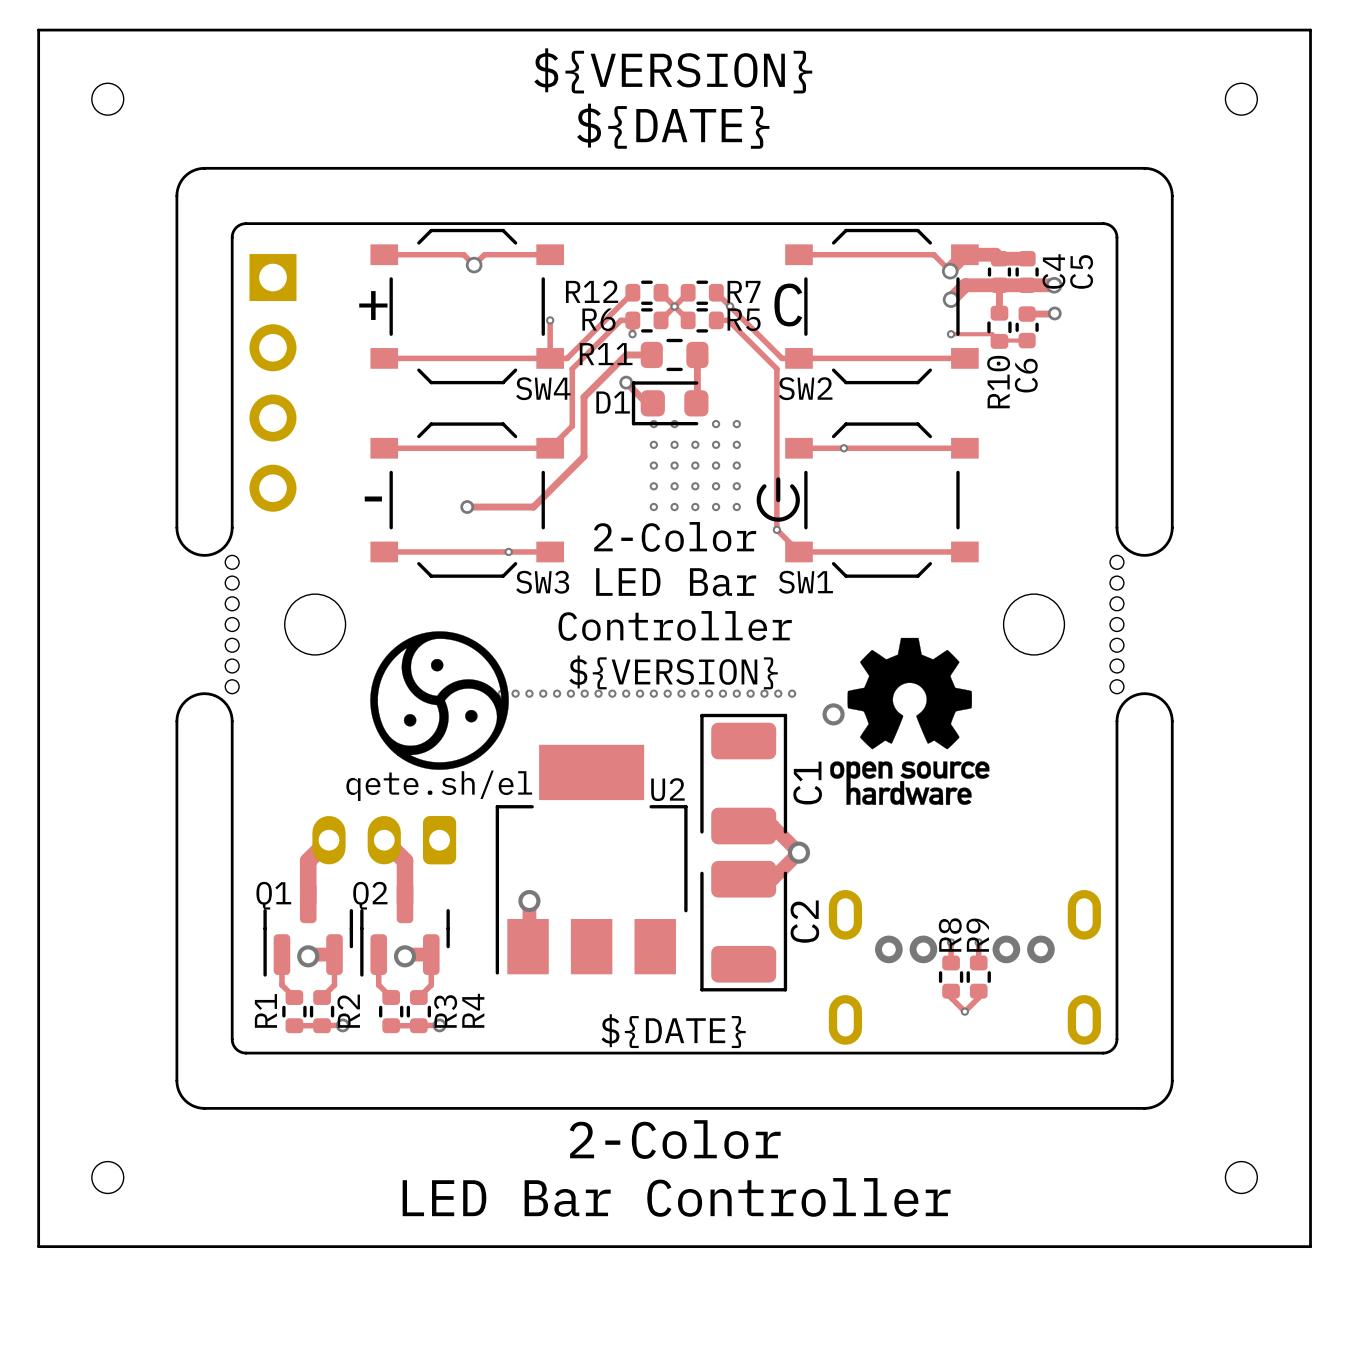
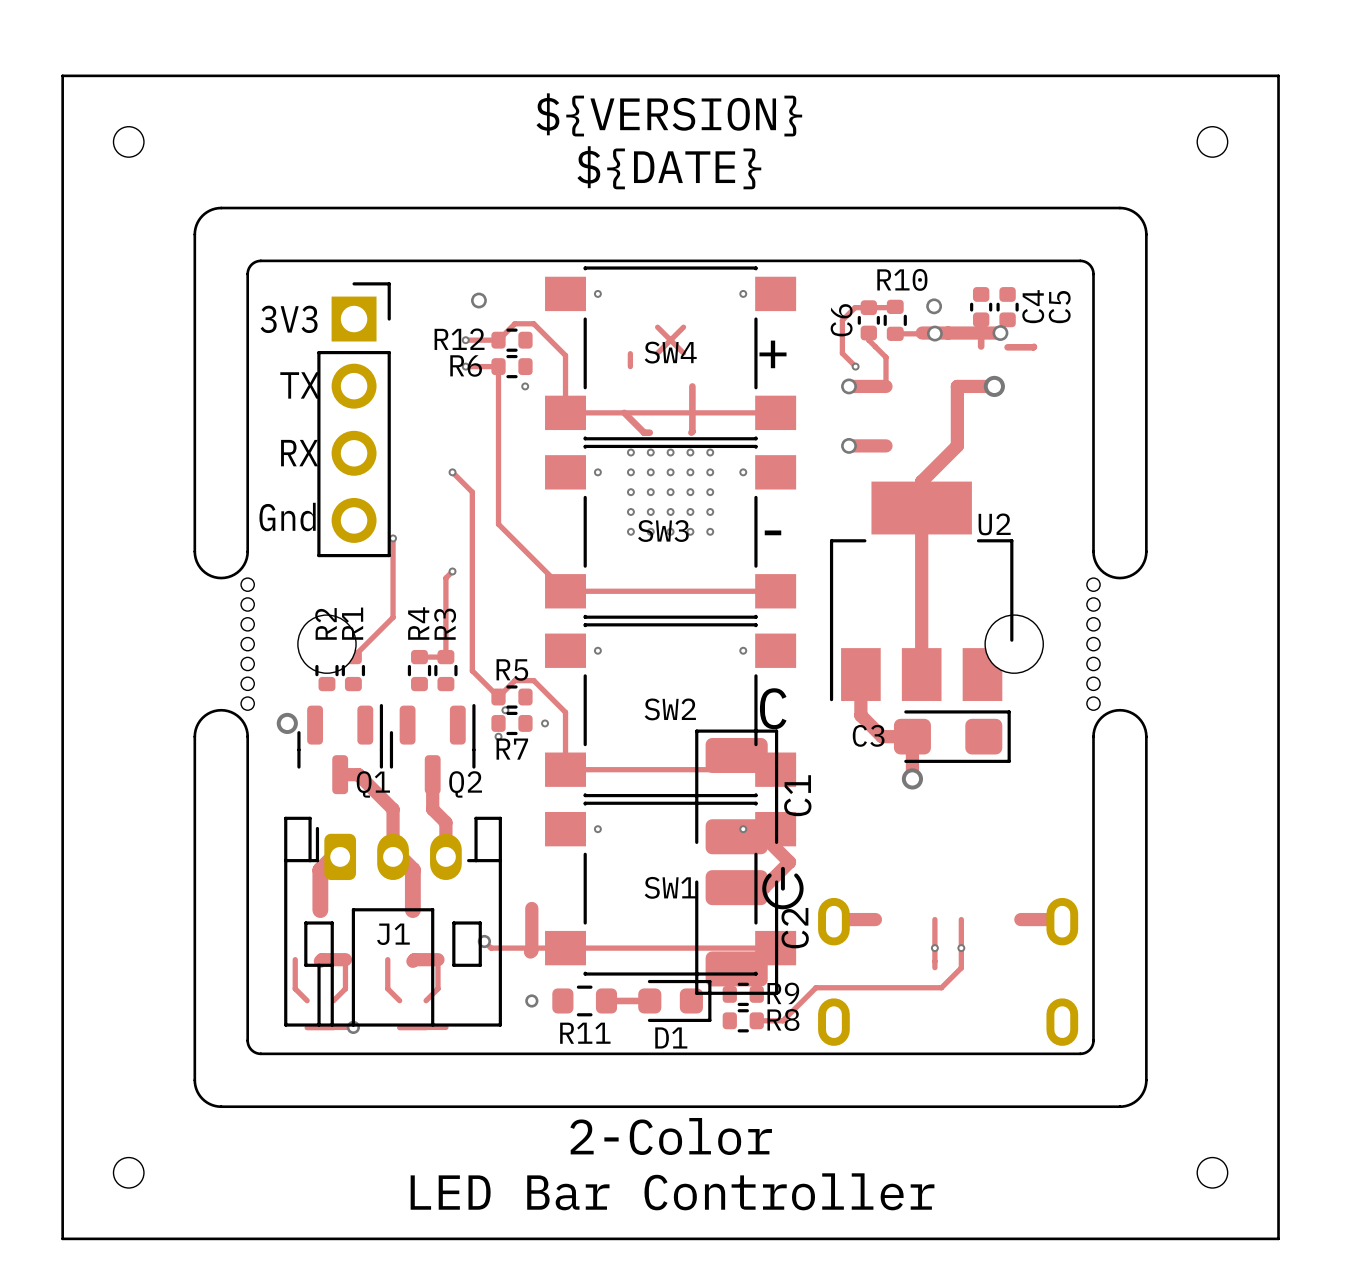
SW4 footprint: [370, 228, 564, 385] -> [545, 266, 797, 441]
SW2 footprint: [785, 228, 979, 385] -> [545, 623, 797, 798]
track: (384, 254) (463, 254) (474, 265) (484, 254) (550, 254) -> none
track: (799, 254) (933, 254) (950, 271) (964, 254) (995, 254) (999, 258) (1027, 258) -> none
via: none -> (597, 293)
via: none -> (743, 293)
track: none -> (895, 306) (855, 307) (842, 320) (842, 353) (855, 366)
text: none -> 3V3 (289, 319)
track: (1054, 285) (965, 285) (951, 299) -> none
via position: (1054, 285) -> (1000, 333)
R7 name position: R7 (744, 291) -> R7 (512, 749)
track: (632, 292) (567, 358) (384, 358) -> none
R12 position: (646, 292) -> (511, 340)
R5 position: (702, 292) -> (511, 697)
track: (716, 292) (782, 358) (964, 358) -> none
track: none -> (868, 333) (868, 340) (886, 357) (886, 386) (849, 386)
track: none -> (1000, 333) (901, 333)
text rotation: 0° (373, 305) -> 180° (773, 354)
text position: + (373, 305) -> + (773, 354)
text position: C (788, 305) -> C (773, 708)
track: none -> (465, 340) (498, 340) (514, 323) (533, 323) (565, 355) (565, 412) (775, 412)
via: none -> (465, 340)
via: (674, 306) -> none
via: (730, 306) -> none
via: (1054, 313) -> none
R5 name position: R5 (744, 319) -> R5 (512, 669)
track: (550, 320) (550, 358) -> none
via: (550, 320) -> none
track: (632, 320) (620, 320) (572, 368) (572, 426) (550, 448) (384, 448) -> none
R6 position: (646, 320) -> (511, 366)
R7 position: (702, 320) -> (511, 723)
track: (716, 320) (728, 320) (776, 368) (776, 529) (799, 551) (964, 551) -> none
R10 position: (999, 327) -> (895, 320)
C6 position: (1027, 327) -> (868, 320)
track: none -> (465, 366) (498, 366) (498, 524) (565, 591) (775, 591)
via: none -> (465, 366)
via: (632, 334) -> none
via: none -> (855, 366)
track: (951, 334) (992, 334) (999, 341) (1027, 340) -> none
via: (951, 334) -> none
text: none -> TX (299, 385)
via: none -> (525, 386)
R11 name position: R11 (606, 354) -> R11 (585, 1033)
track: (651, 354) (626, 354) (584, 397) (584, 456) (533, 507) (467, 507) -> none
R11 position: (674, 354) -> (584, 1000)
via: none -> (849, 386)
track: none -> (994, 386) (957, 386) (957, 445) (921, 481) (921, 674)
via: none -> (994, 386)
C6 name position: C6 (1026, 375) -> C6 (841, 320)
part side: bottom (272, 382) -> top (354, 419)
via: (626, 382) -> none
R10 name rotation: 0° (998, 382) -> 90° clockwise (902, 279)
R10 name position: R10 (998, 382) -> R10 (902, 279)
SW4 name position: SW4 (543, 388) -> SW4 (670, 352)
SW2 name position: SW2 (805, 388) -> SW2 (670, 709)
D1 name position: D1 (613, 402) -> D1 (671, 1037)
D1 rotation: 0° (670, 403) -> 180° (674, 1000)
D1 position: (670, 403) -> (674, 1000)
track: none -> (849, 445) (886, 445)
via: none -> (849, 445)
SW3 footprint: [370, 422, 564, 578] -> [545, 444, 797, 619]
SW1 footprint: [785, 422, 979, 578] -> [545, 801, 797, 976]
text: none -> RX (299, 453)
via: none -> (630, 452)
via: none -> (690, 452)
via: (736, 424) -> none
track: none -> (452, 472) (472, 492) (472, 670) (498, 697) (514, 680) (533, 680) (565, 712) (565, 769) (775, 769)
via: none -> (452, 472)
via: none -> (597, 472)
via: none -> (630, 472)
via: (736, 444) -> none
via: none -> (743, 472)
track: (799, 448) (964, 448) -> none
via: (843, 448) -> none
via: none -> (630, 492)
via: (736, 465) -> none
line: (778, 479) (778, 500) -> (782, 868) (782, 888)
via: none -> (630, 511)
via: (736, 486) -> none
line: (764, 486) (758, 497) (760, 507) (768, 517) (778, 519) (788, 517) (796, 507) (797, 497) (792, 486) -> (769, 875) (764, 883) (765, 895) (773, 904) (782, 907) (792, 904) (800, 895) (801, 886) (796, 875)
text: none -> Gnd (287, 517)
text rotation: 0° (373, 498) -> 180° (773, 532)
text position: - (373, 498) -> - (773, 532)
via: (467, 507) -> none
via: none -> (630, 531)
via: (736, 507) -> none
track: none -> (393, 538) (393, 617) (353, 657) (326, 657)
via: none -> (393, 538)
via: (776, 529) -> none
text: 2-Color (675, 536) -> none
track: none -> (452, 571) (445, 578) (445, 657) (419, 657)
via: none -> (452, 571)
track: (384, 551) (550, 551) -> none
via: (508, 551) -> none
SW3 name position: SW3 (542, 582) -> SW3 (663, 531)
text: LED Bar (676, 582) -> none
SW1 name position: SW1 (805, 582) -> SW1 (670, 887)
text: Controller (675, 625) -> none
drawing: [370, 631, 509, 770] -> none
via: none -> (597, 650)
via: none -> (743, 650)
drawing: [830, 637, 990, 805] -> none
track: none -> (860, 674) (860, 715) (882, 736) (912, 736) (912, 778)
text: ${VERSION} (673, 672) -> none
via: (515, 693) -> none
via: (529, 693) -> none
via: (543, 693) -> none
via: (557, 693) -> none
via: (570, 693) -> none
via: (584, 693) -> none
via: (598, 693) -> none
via: (612, 693) -> none
via: (626, 693) -> none
via: (640, 693) -> none
via: (653, 693) -> none
via: (667, 693) -> none
via: (681, 693) -> none
via: (695, 693) -> none
via: (709, 693) -> none
via: (722, 693) -> none
via: (736, 693) -> none
via: (750, 693) -> none
via: (764, 693) -> none
via: (778, 693) -> none
via: (792, 693) -> none
via: none -> (287, 723)
via: none -> (545, 723)
via: (833, 714) -> none
via: none -> (498, 736)
C3: none -> (952, 736)
track: none -> (340, 774) (358, 774) (393, 809) (393, 856)
track: none -> (432, 774) (432, 809) (445, 822) (445, 856)
via: none -> (912, 778)
text: qete.sh/el (439, 785) -> none
via: none -> (597, 829)
via: none -> (743, 829)
J1 side: bottom (384, 840) -> top (393, 921)
via: (799, 852) -> none
U2 position: (591, 859) -> (921, 591)
via: (529, 901) -> none
track: none -> (875, 919) (836, 919) (833, 921)
track: none -> (934, 919) (934, 948)
track: none -> (961, 919) (961, 948)
track: none -> (1020, 919) (1060, 919) (1062, 921)
Q1 rotation: 0° (308, 929) -> 180° (340, 749)
Q1 position: (308, 929) -> (340, 749)
Q2 rotation: 0° (405, 929) -> 180° (432, 749)
Q2 position: (405, 929) -> (432, 749)
track: none -> (484, 941) (490, 948) (775, 948)
via: none -> (484, 941)
via: (888, 949) -> none
via: (923, 949) -> none
via: (1006, 949) -> none
via: (1040, 949) -> none
via: (308, 956) -> none
via: (405, 956) -> none
track: none -> (961, 967) (941, 987) (815, 987) (782, 1020) (756, 1020)
R8 rotation: 0° (951, 977) -> 90° clockwise (743, 1020)
R8 position: (951, 977) -> (743, 1020)
R9 rotation: 0° (978, 977) -> 90° clockwise (743, 994)
R9 position: (978, 977) -> (743, 994)
track: (951, 991) (951, 997) (964, 1011) (978, 997) (978, 991) -> none
via: none -> (531, 1000)
track: none -> (606, 1000) (649, 1000)
R1 name position: R1 (265, 1010) -> R1 (352, 623)
R4 name position: R4 (473, 1010) -> R4 (418, 623)
R1 position: (294, 1011) -> (353, 670)
R2 position: (322, 1011) -> (326, 670)
R2 name position: R2 (348, 1011) -> R2 (325, 623)
R3 position: (391, 1011) -> (445, 670)
R4 position: (418, 1011) -> (419, 670)
R3 name position: R3 (445, 1011) -> R3 (445, 624)
via: (964, 1011) -> none
via: (439, 1025) -> none
text: ${DATE} (673, 1031) -> none

